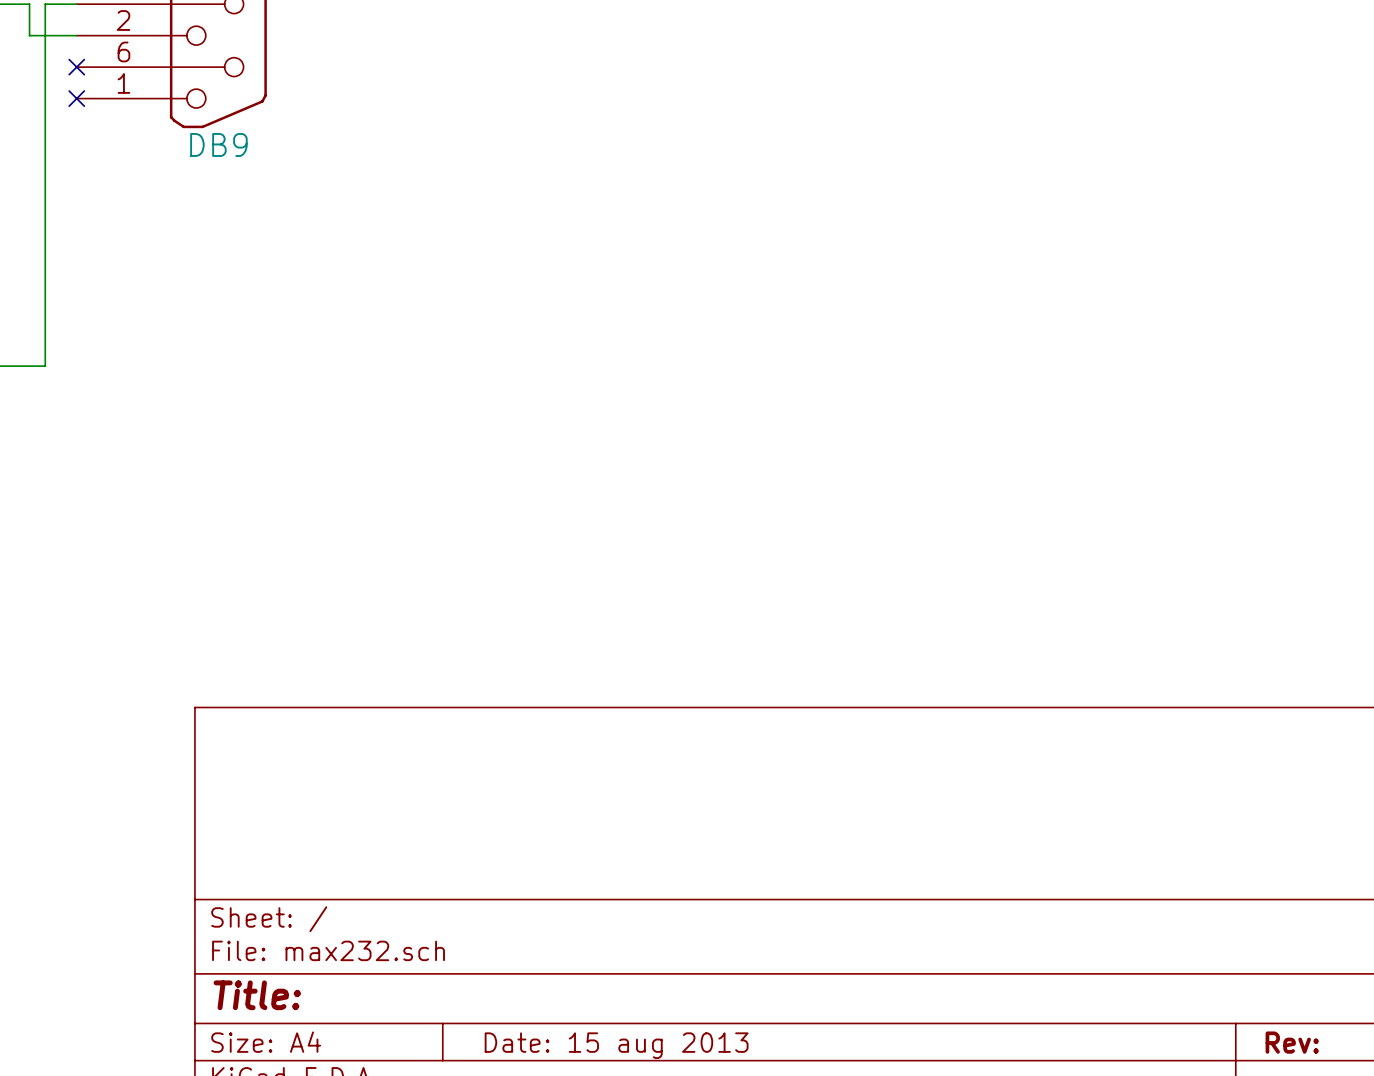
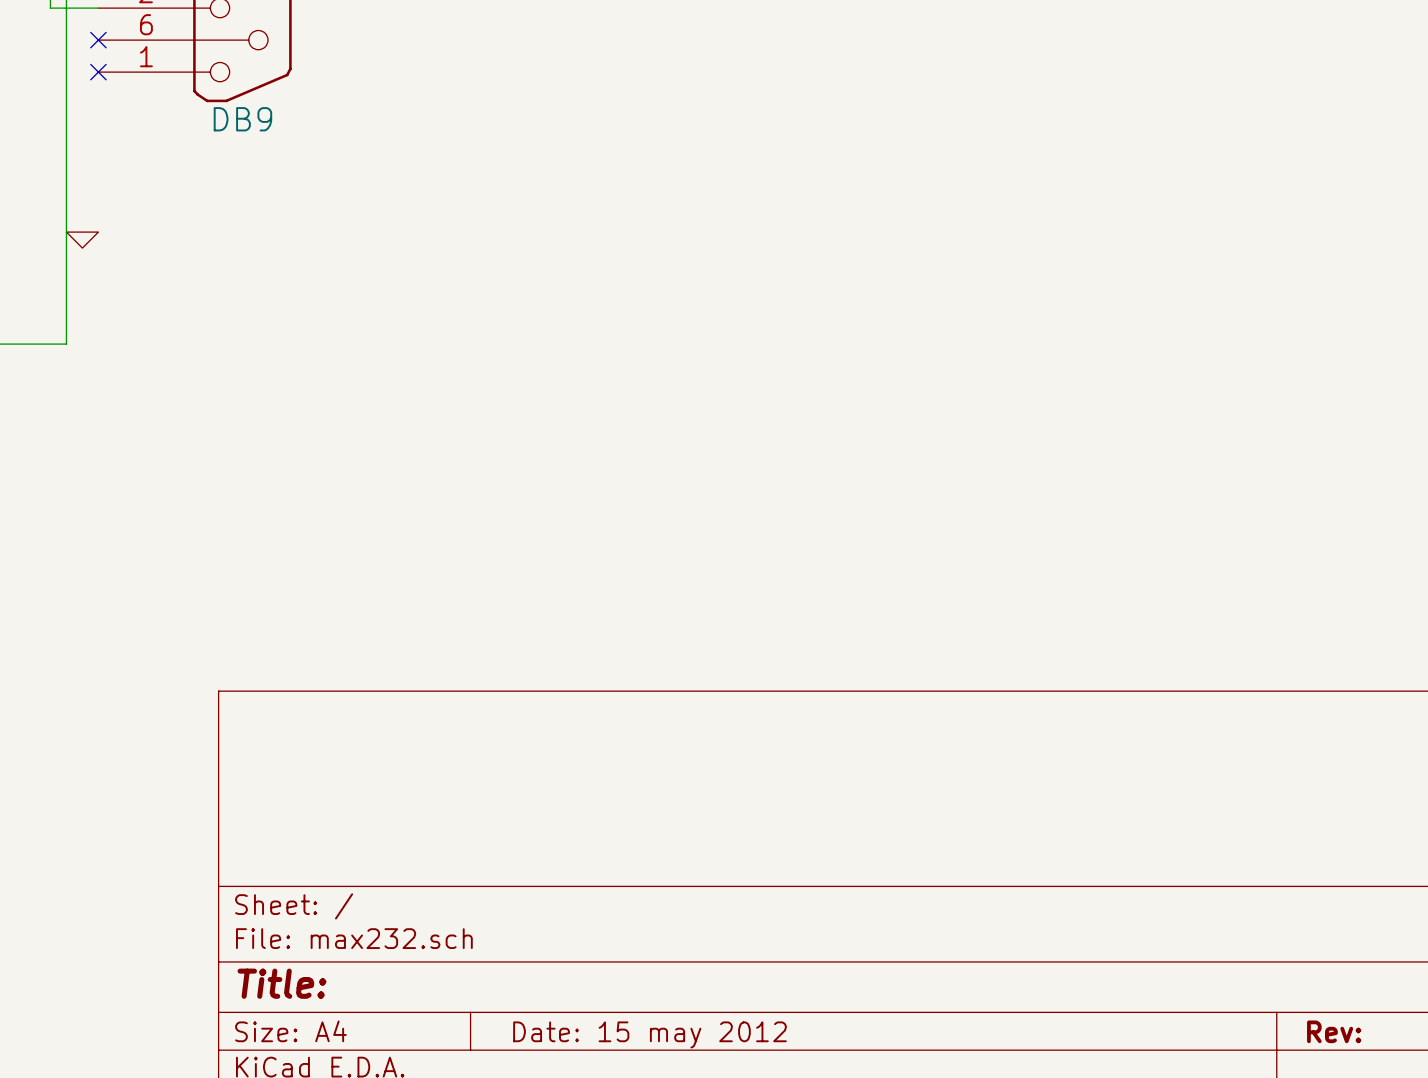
power symbol: none -> (82, 240)
title block: Date: 15 aug 2013 (616, 1045) -> Date: 15 may 2012 (649, 1034)

